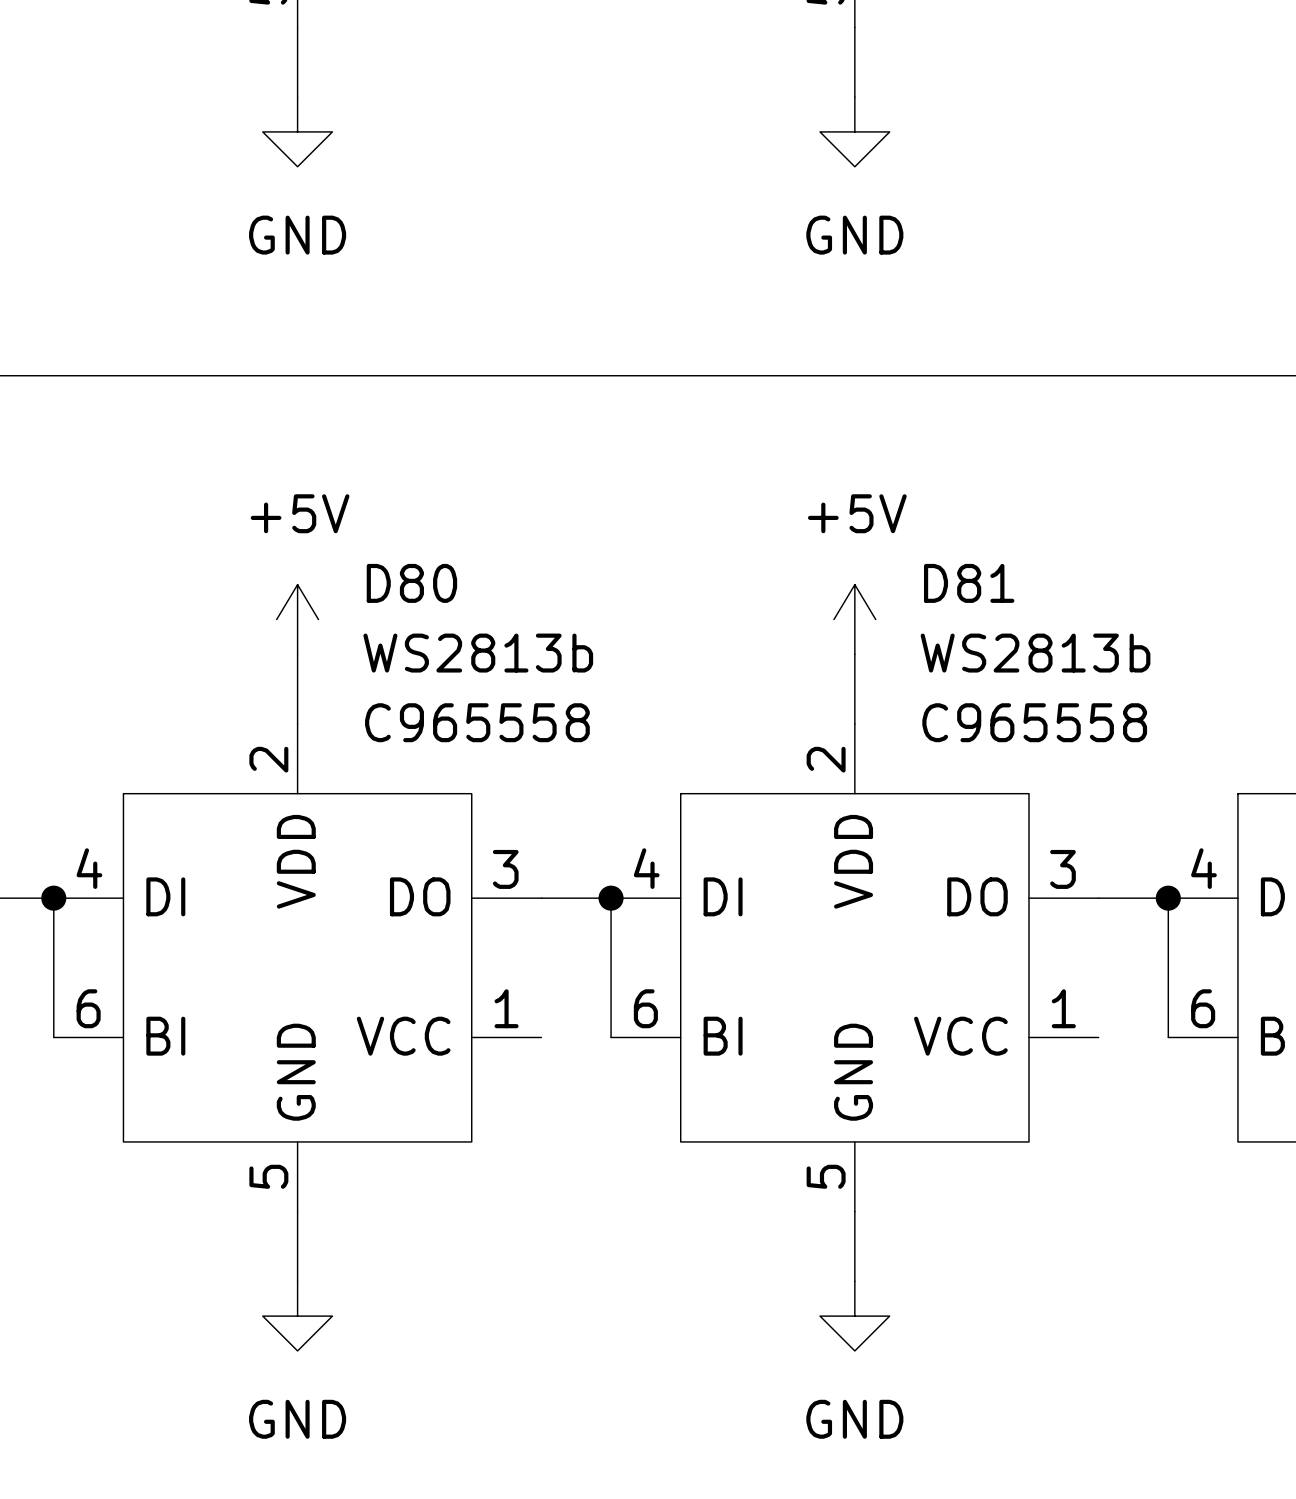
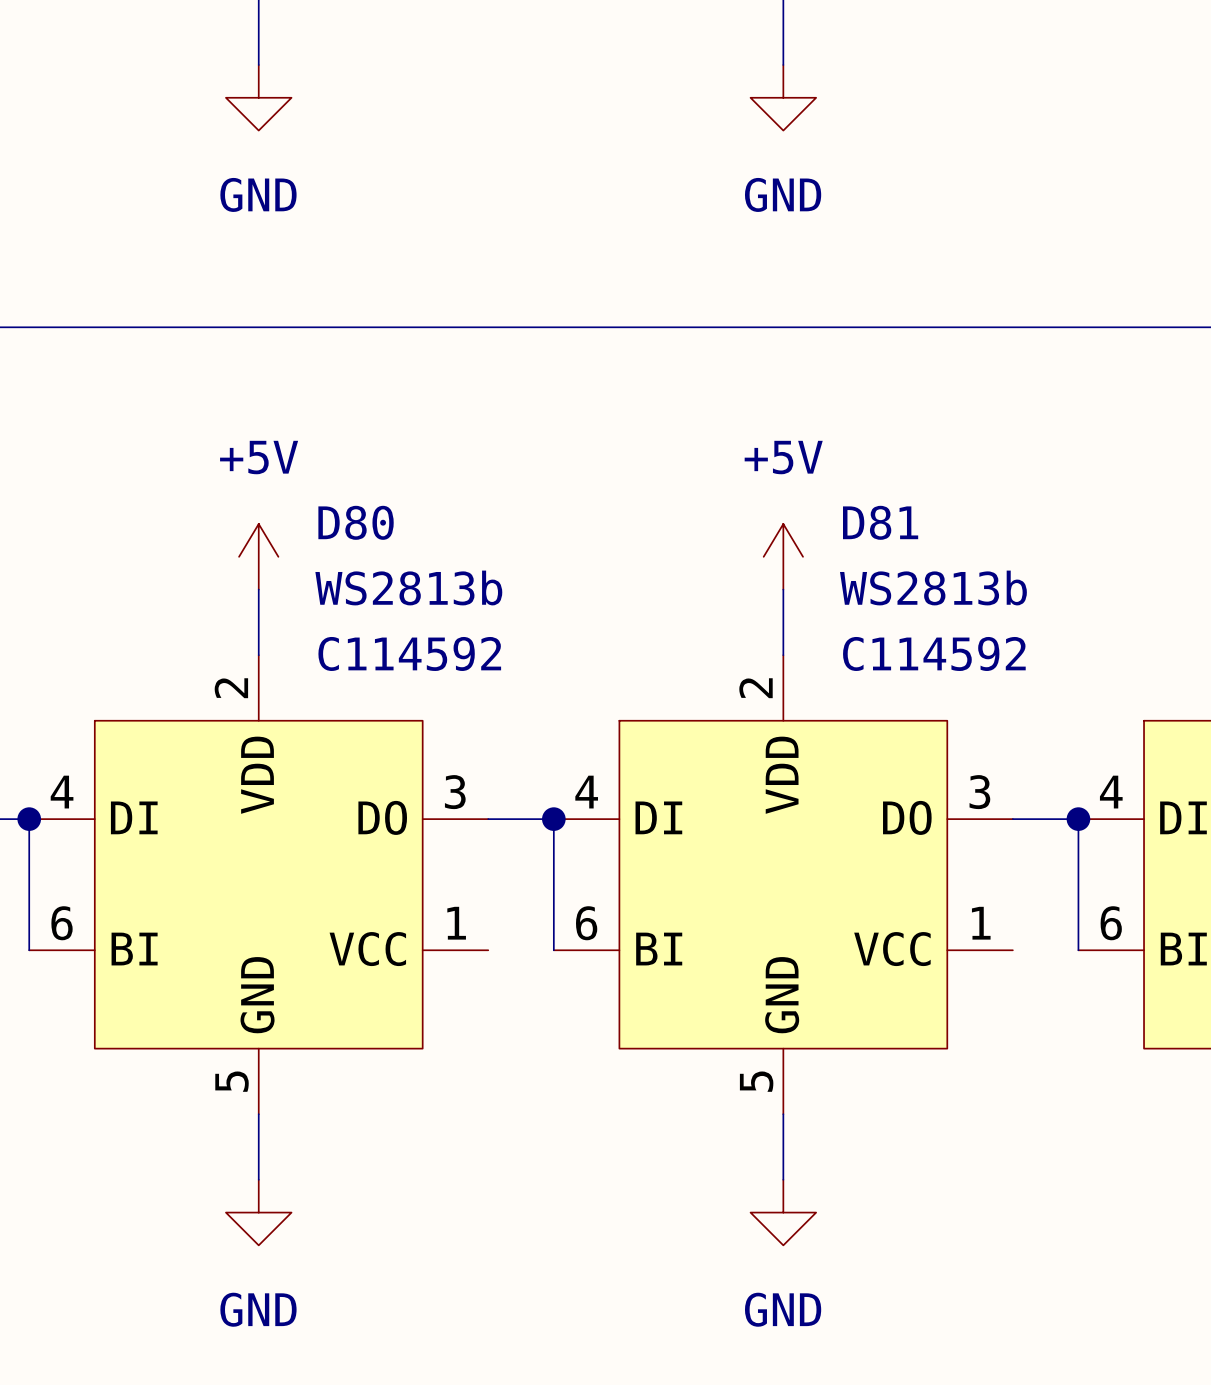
D80 text: C965558 (477, 722) -> C114592 (409, 653)
D81 text: C965558 (1034, 722) -> C114592 (934, 653)

